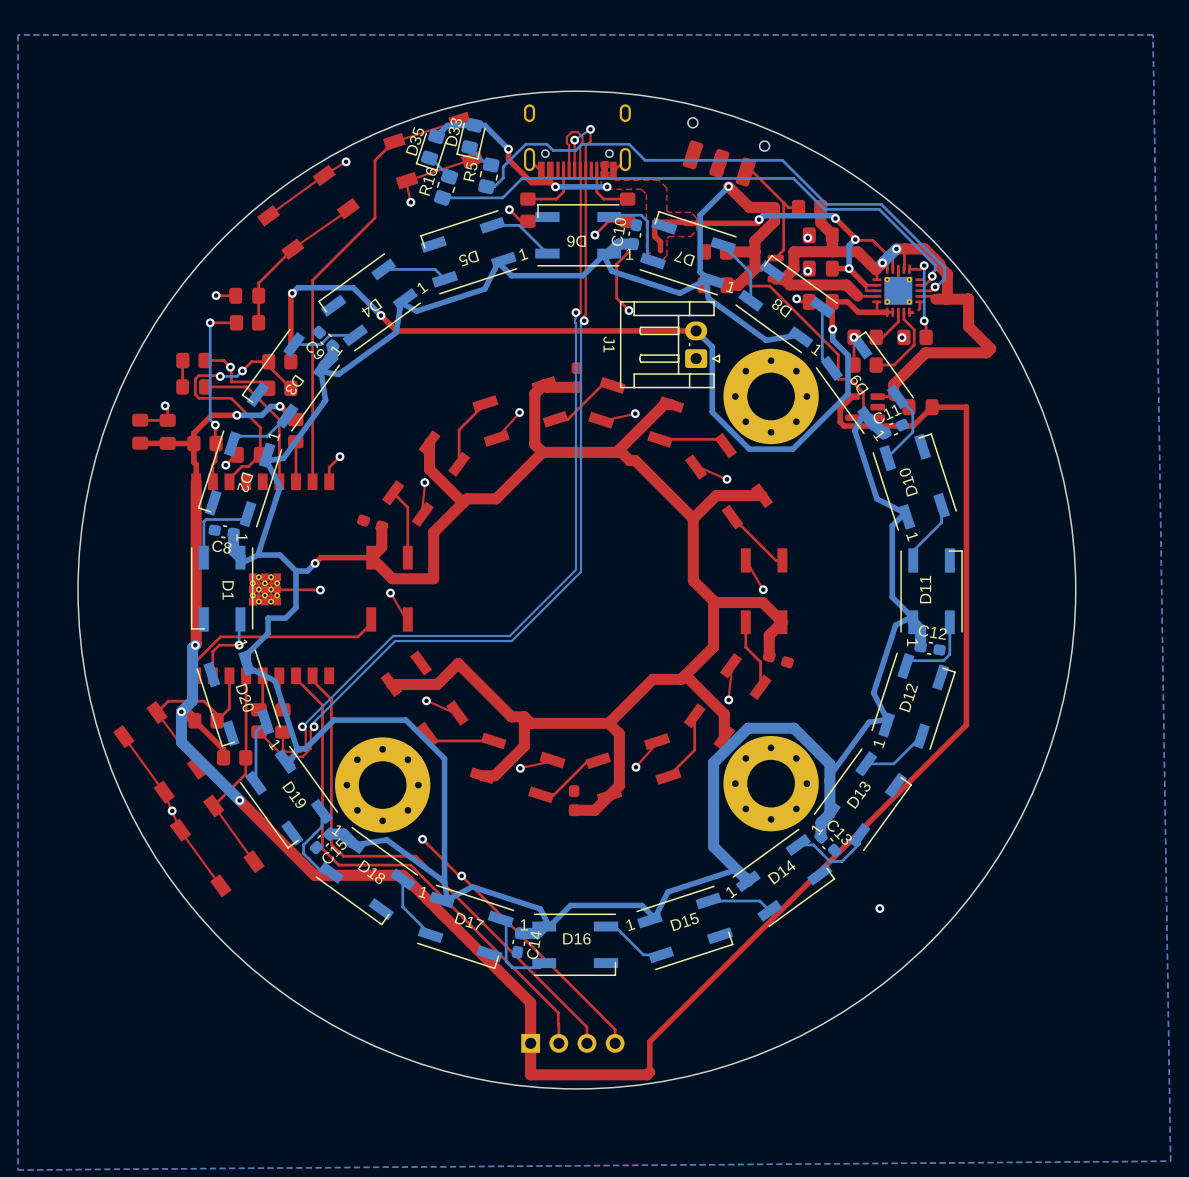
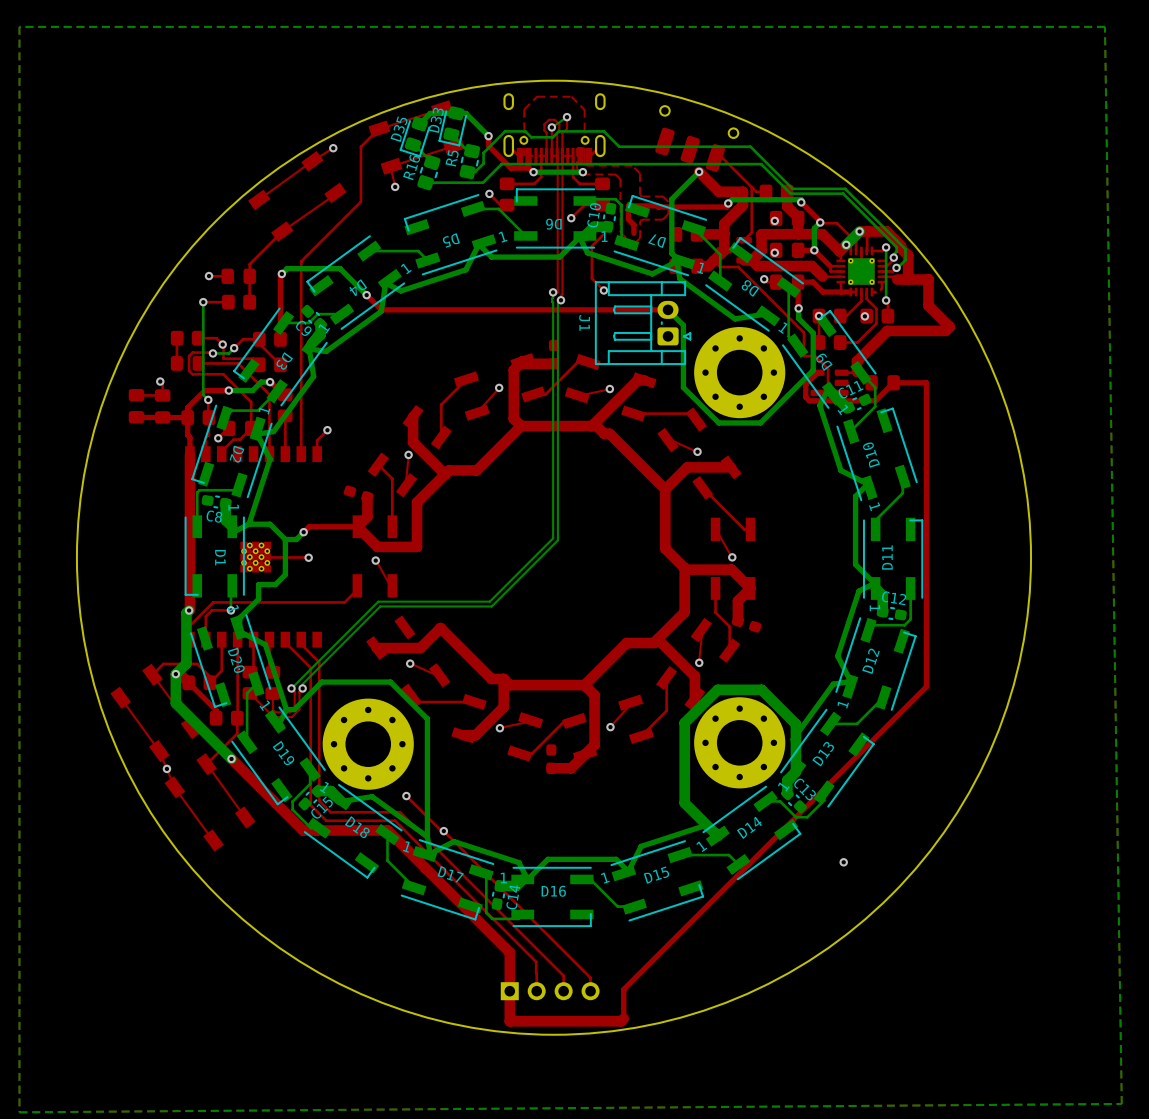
top zone outline: none -> (584, 148) (584, 109) (571, 96) (537, 96) (524, 109) (524, 155) (584, 155)

